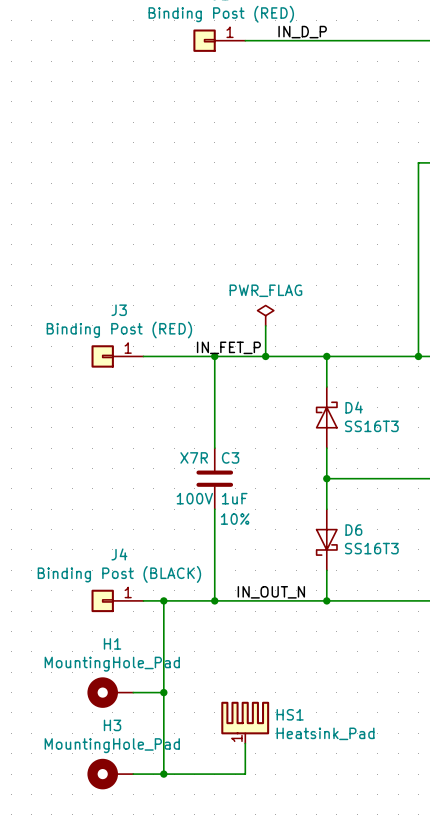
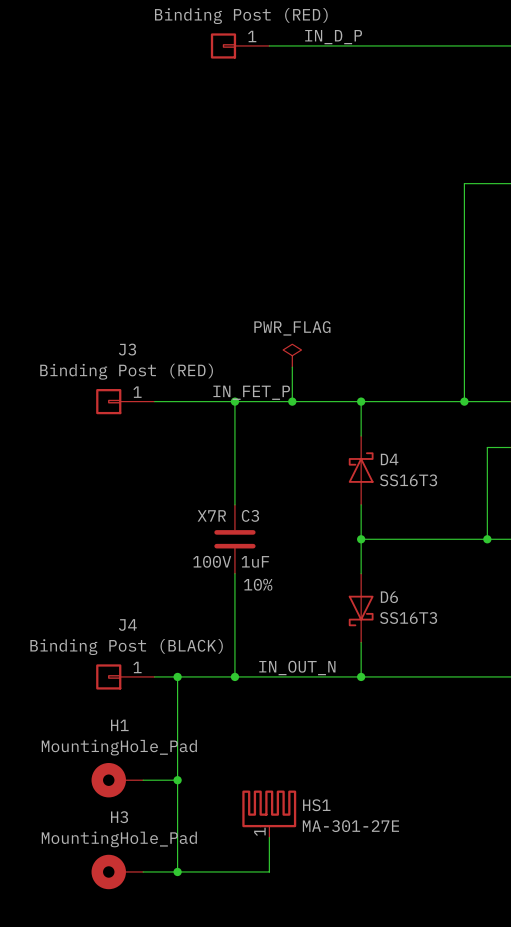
HS1 value: Heatsink_Pad (325, 733) -> MA-301-27E (350, 826)

